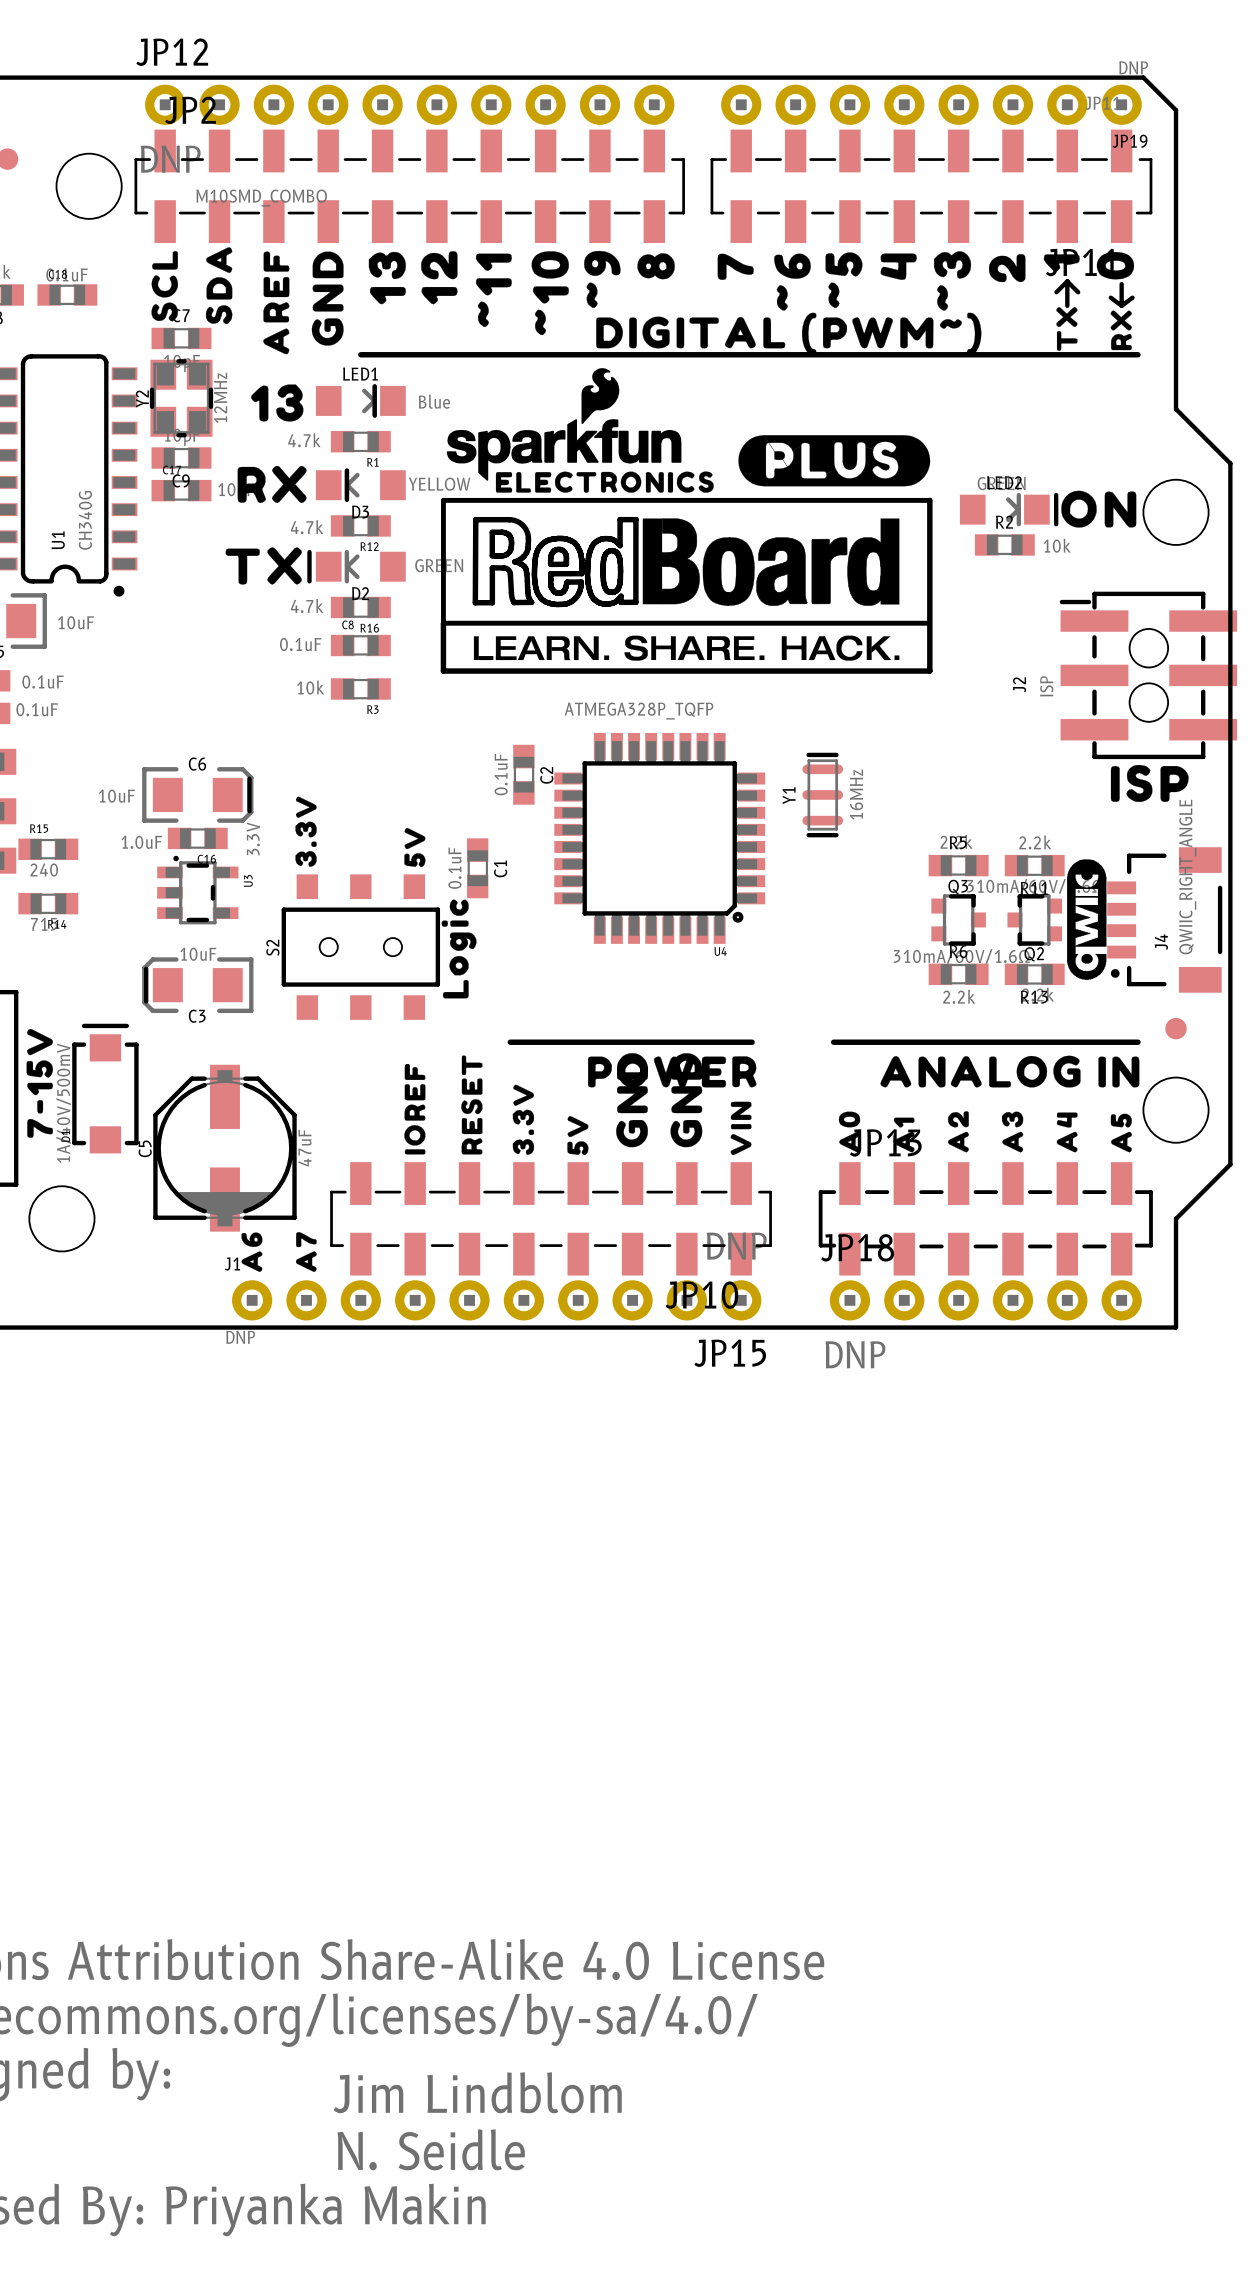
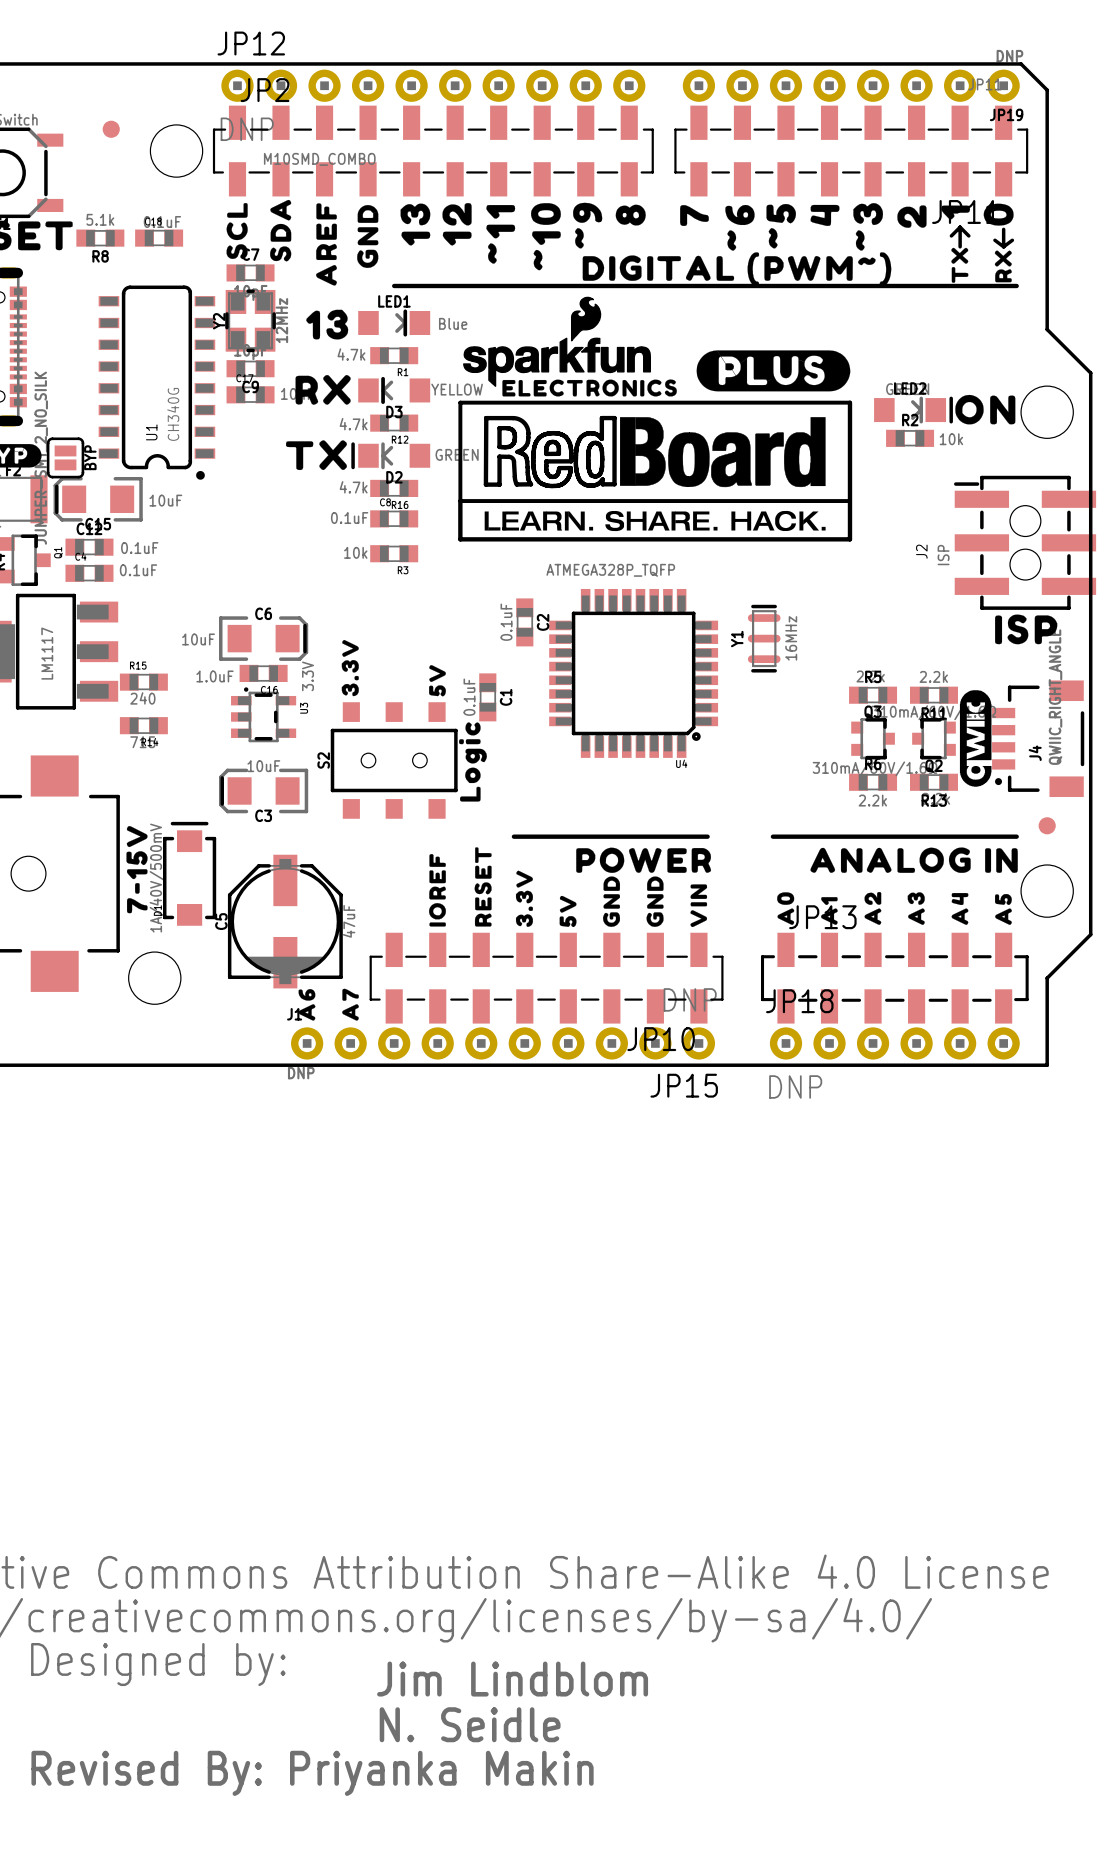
drawing shape: [311, 251, 344, 346] -> [357, 205, 379, 268]
drawing: [616, 1053, 703, 1148] -> none
drawing: none -> [603, 876, 621, 927]
drawing: none -> [646, 876, 664, 927]

